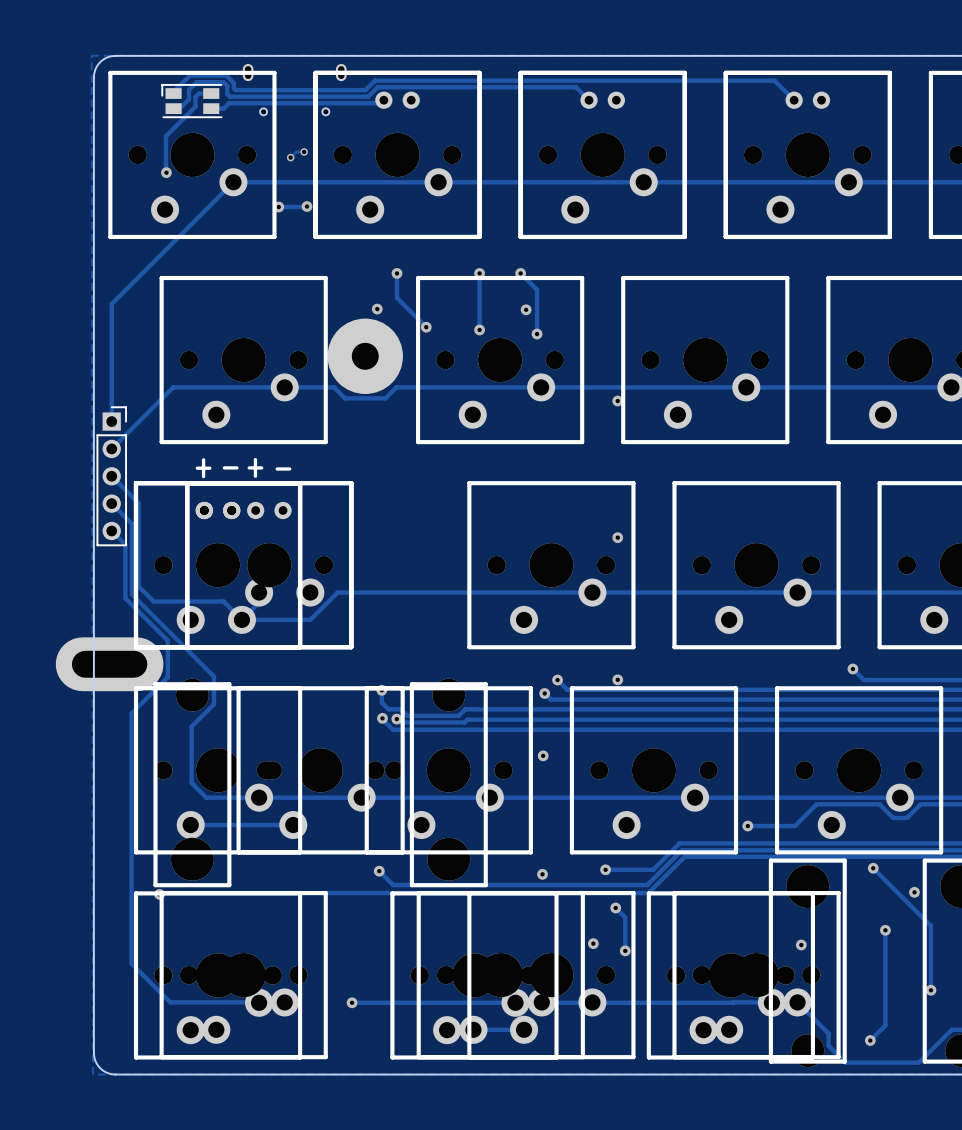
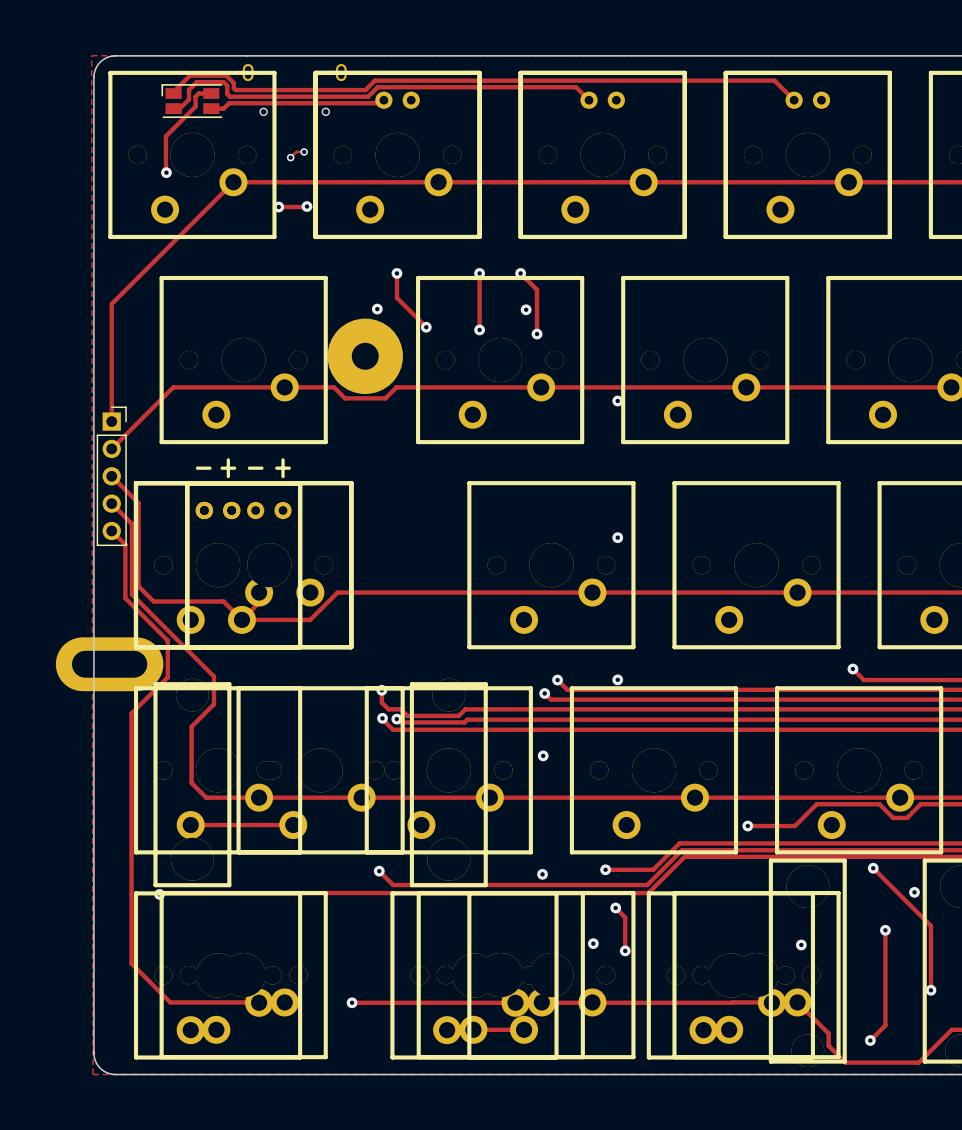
text: - (230, 467) -> + (228, 468)
text: + (255, 467) -> - (255, 468)
text: + (203, 468) -> - (203, 468)
text: - (283, 468) -> + (283, 468)

